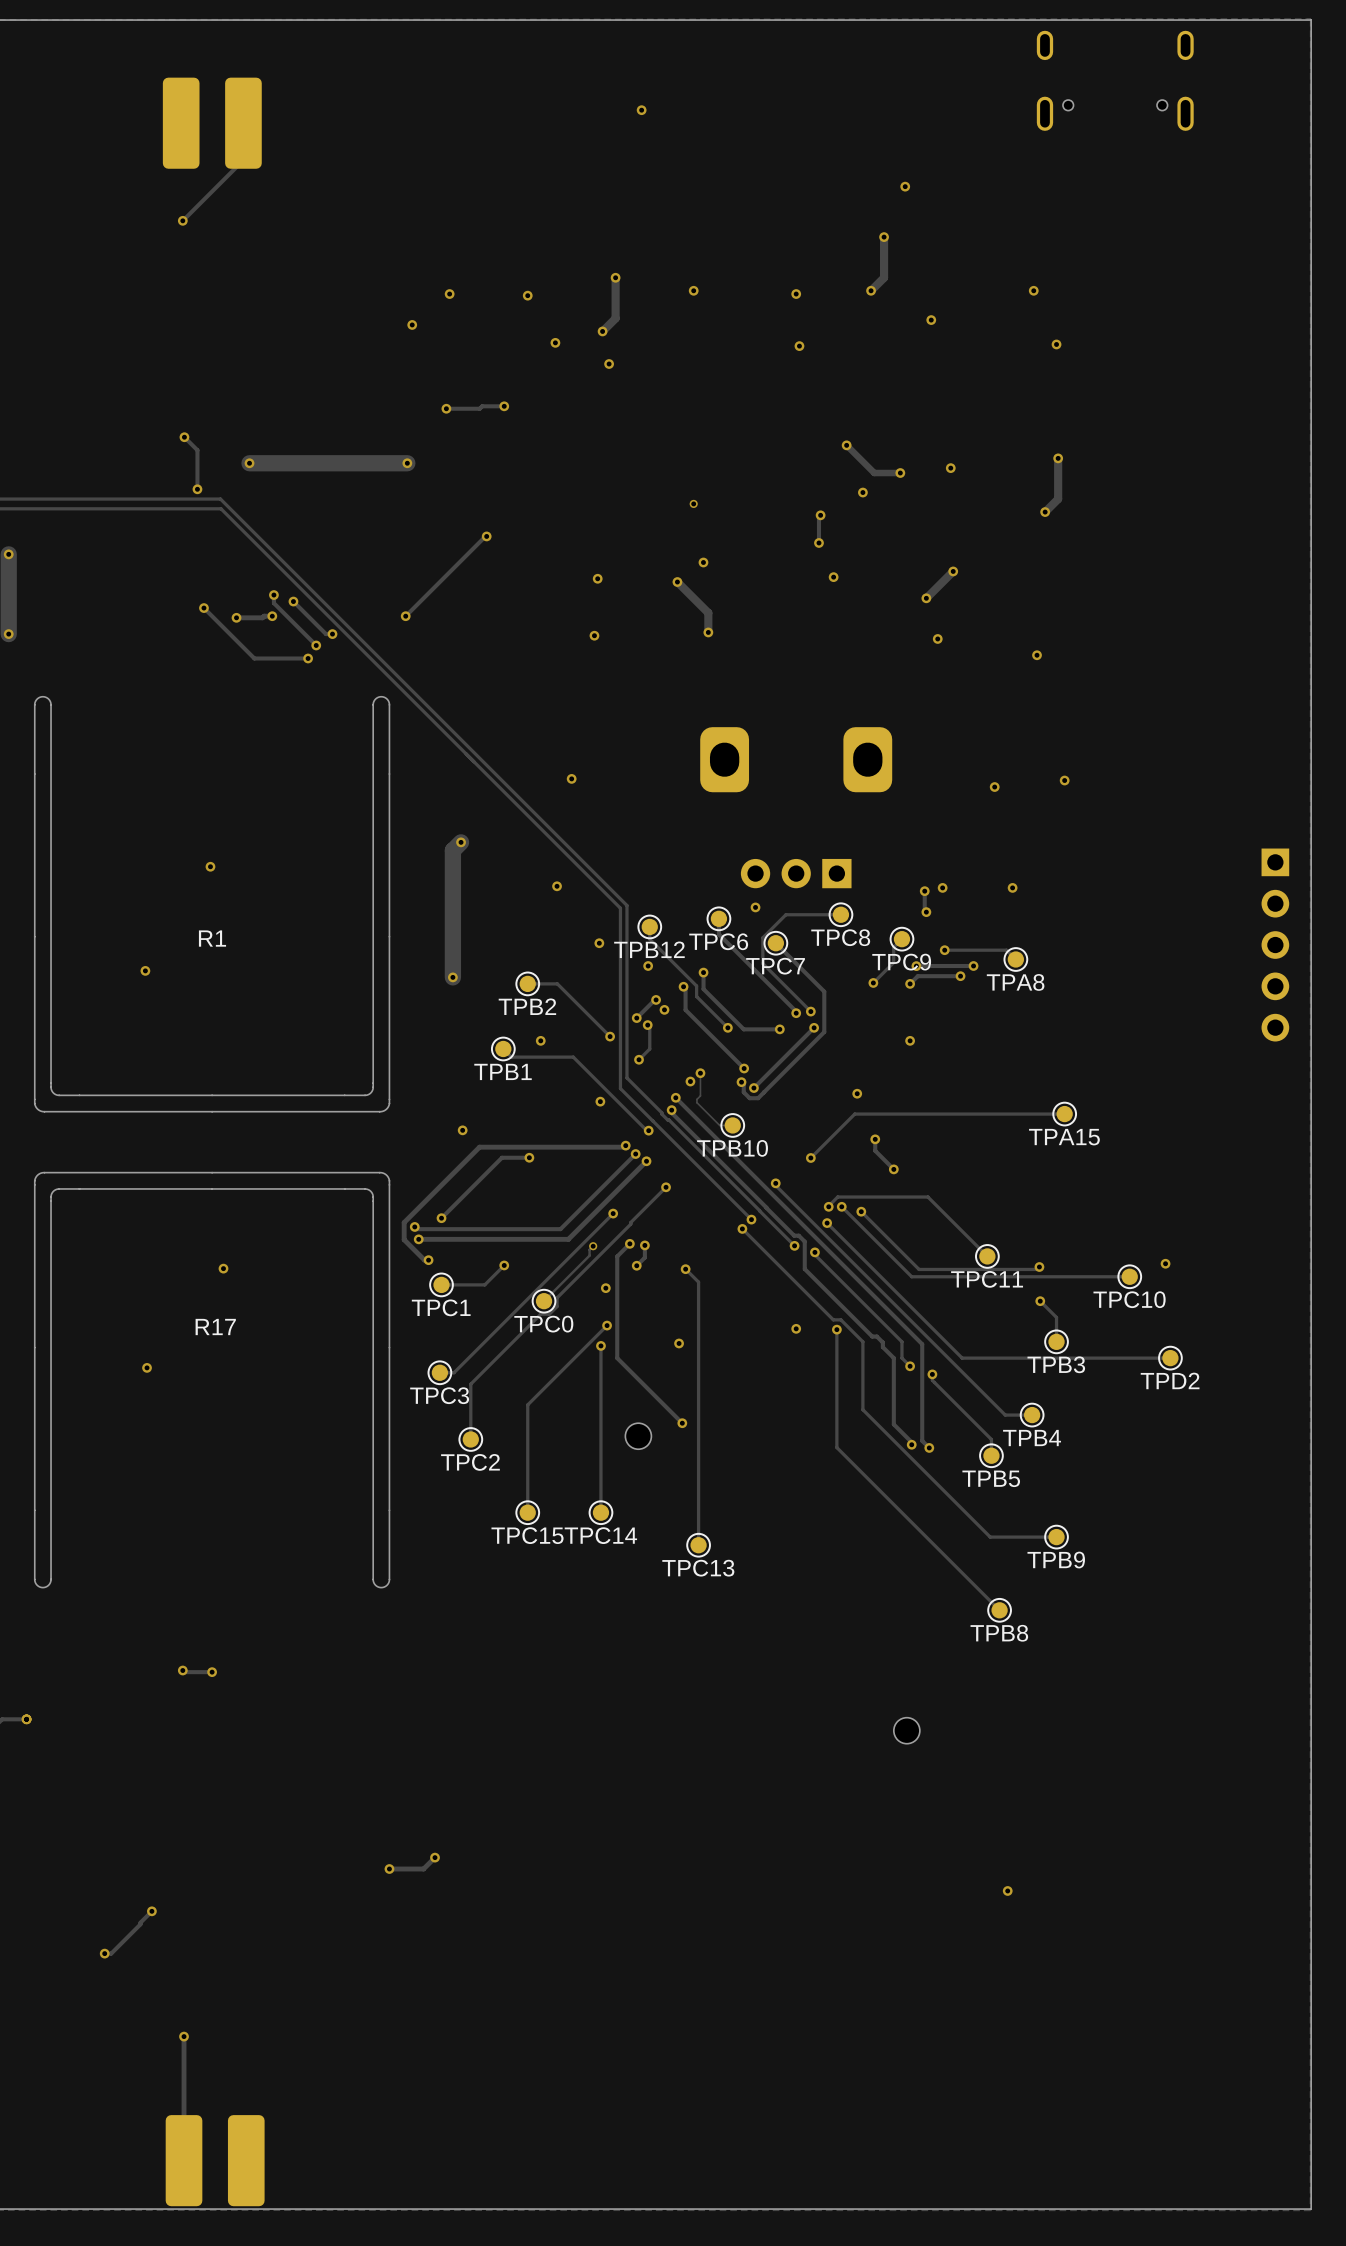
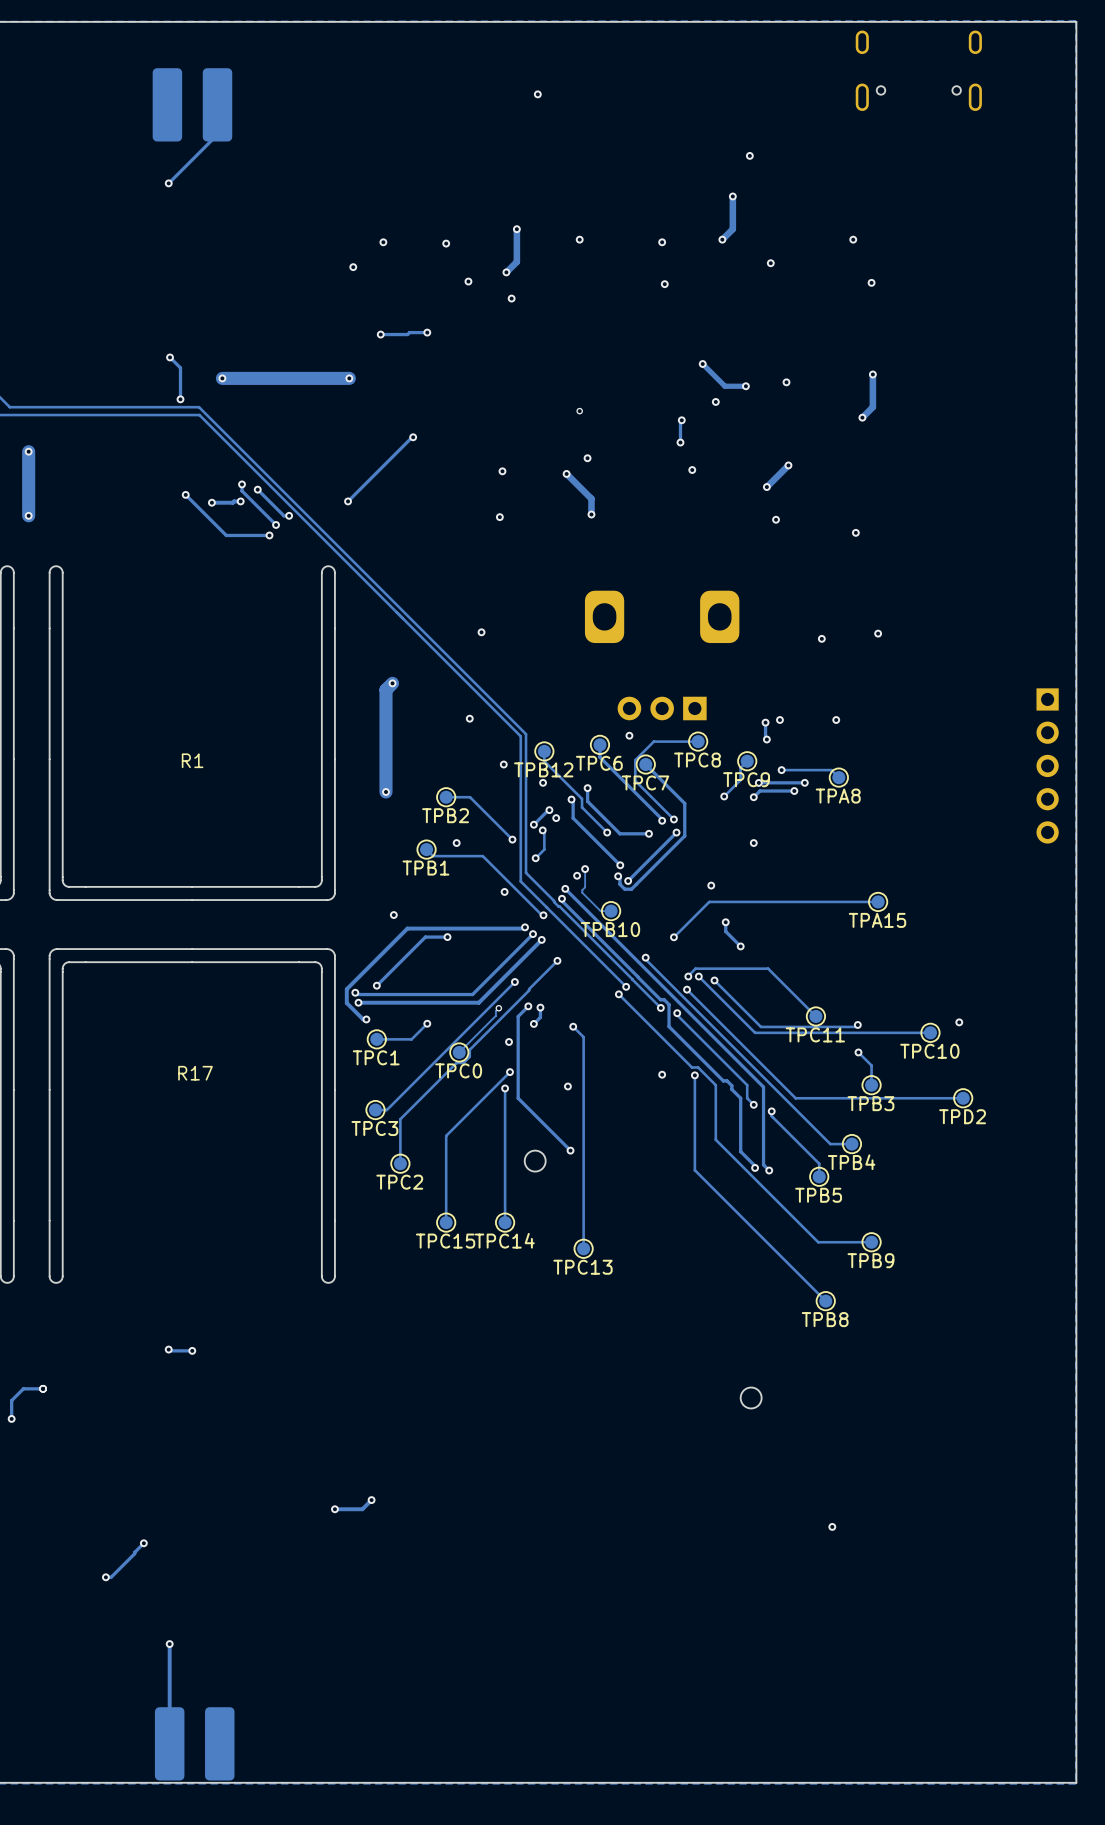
via: (210, 866) -> none
via: (145, 970) -> none
via: (223, 1268) -> none
via: (147, 1367) -> none

